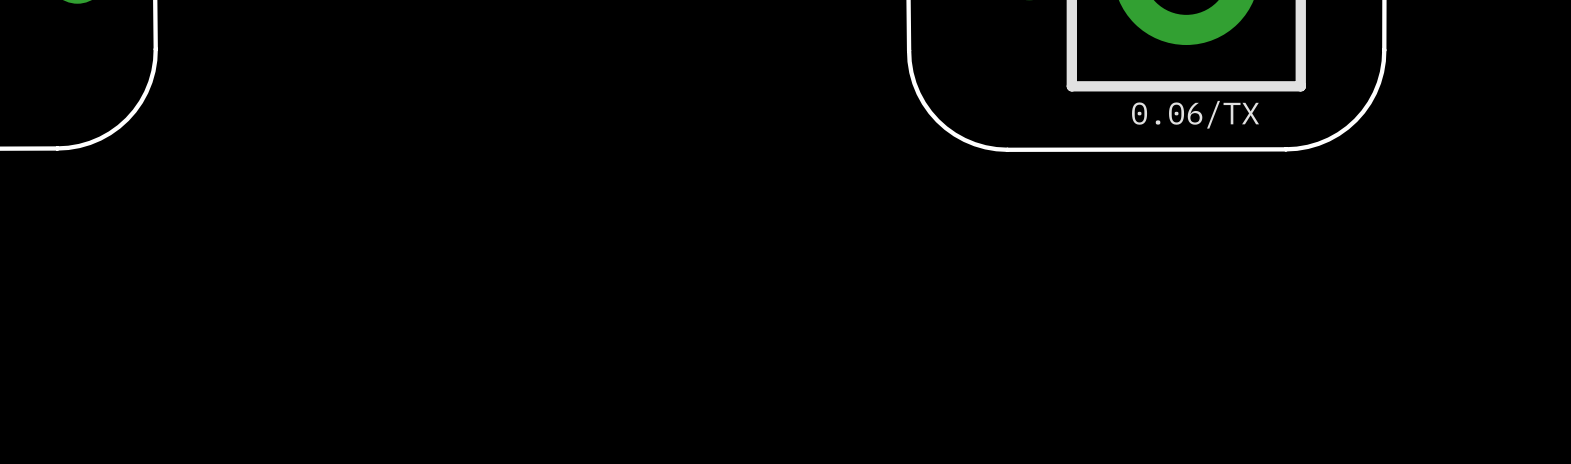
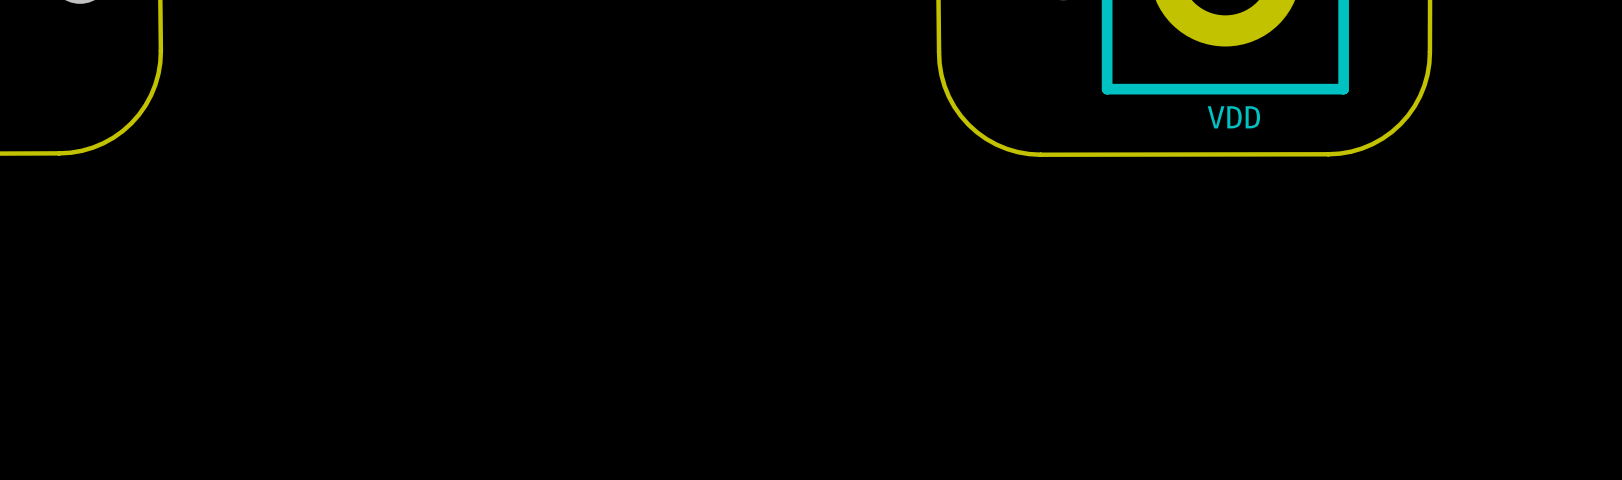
text: 0.06/TX (1195, 114) -> VDD (1233, 117)

